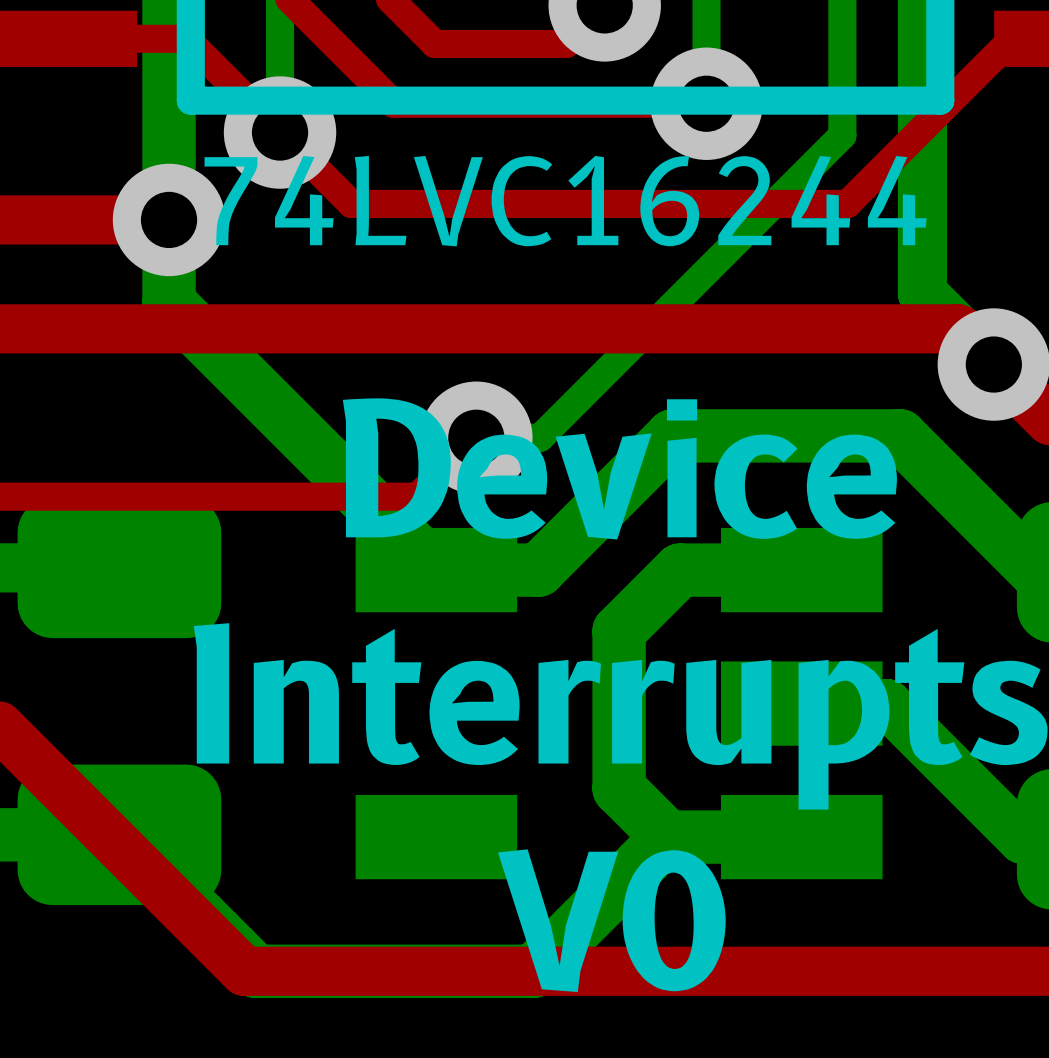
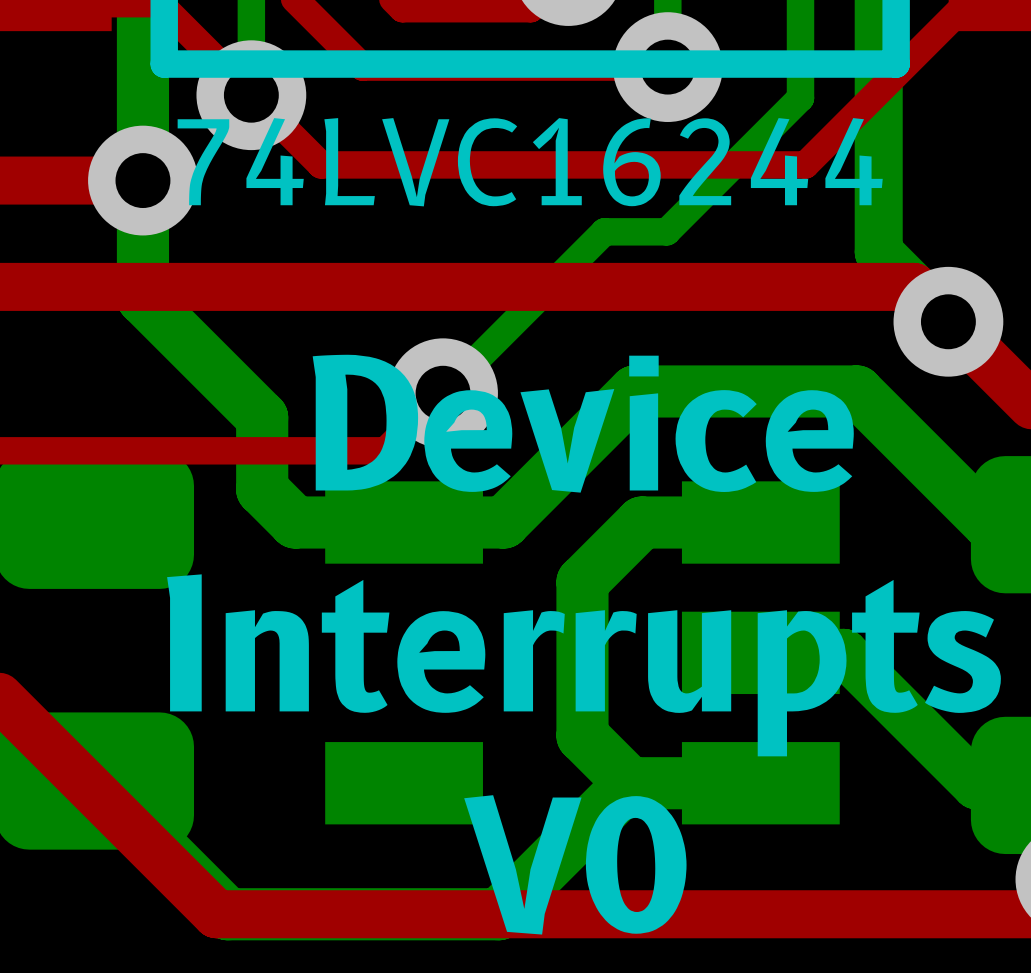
bottom track: (705, 272) (540, 437) (476, 437) -> (666, 231) (604, 231) (443, 393)
bottom track: (169, 302) (436, 570) -> (142, 261) (142, 298) (262, 417) (262, 489) (295, 522) (404, 522)

